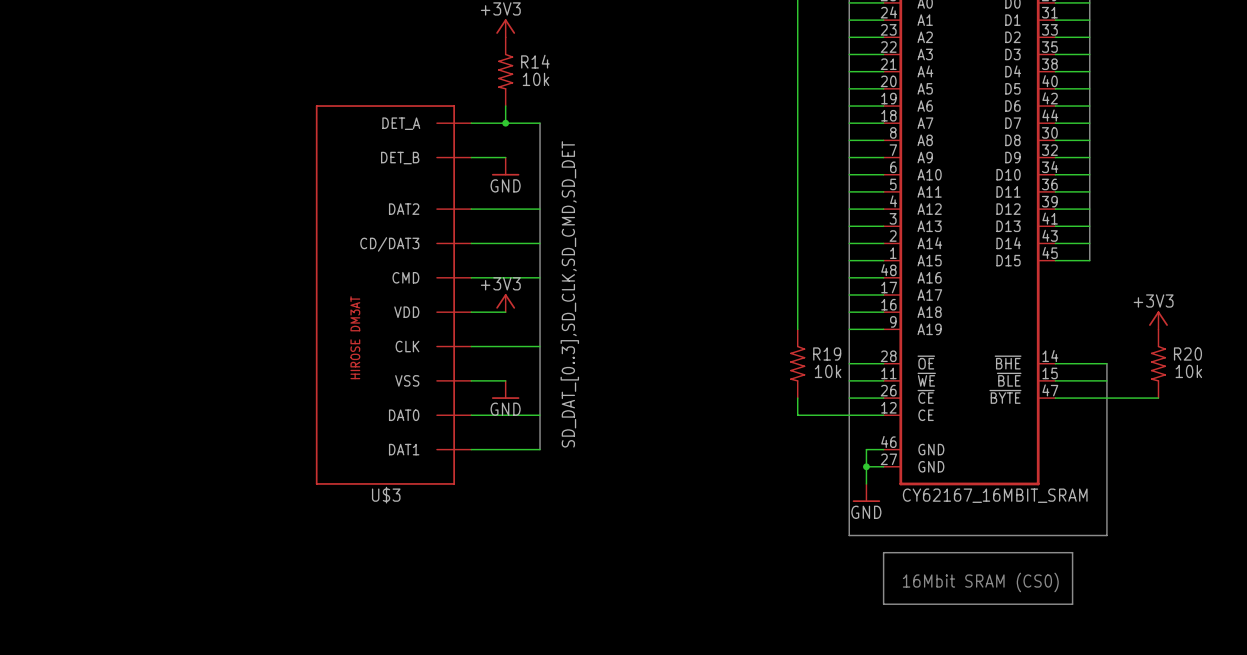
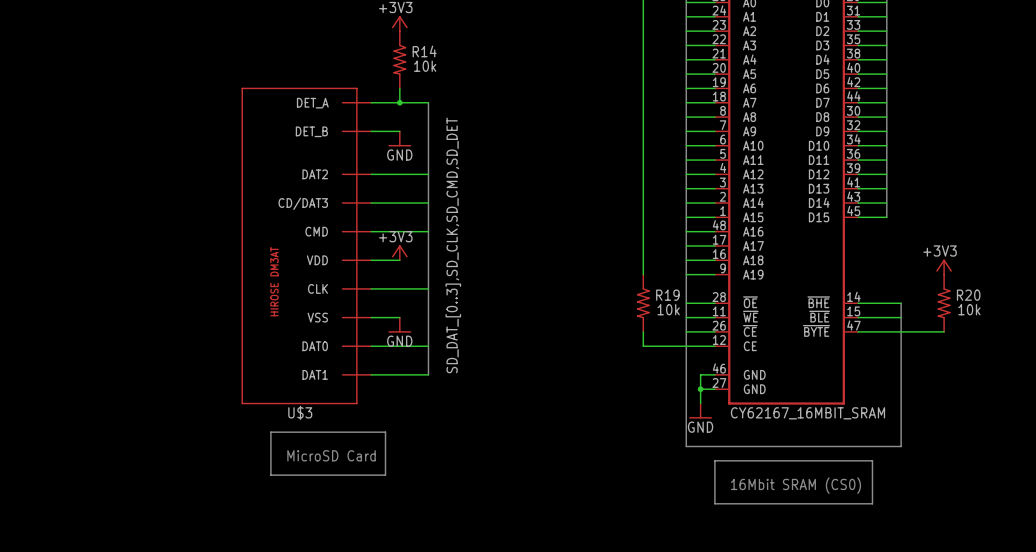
line: none -> (270, 432) (270, 475) (385, 475) (385, 432) (270, 432)
text: none -> MicroSD Card (331, 455)

